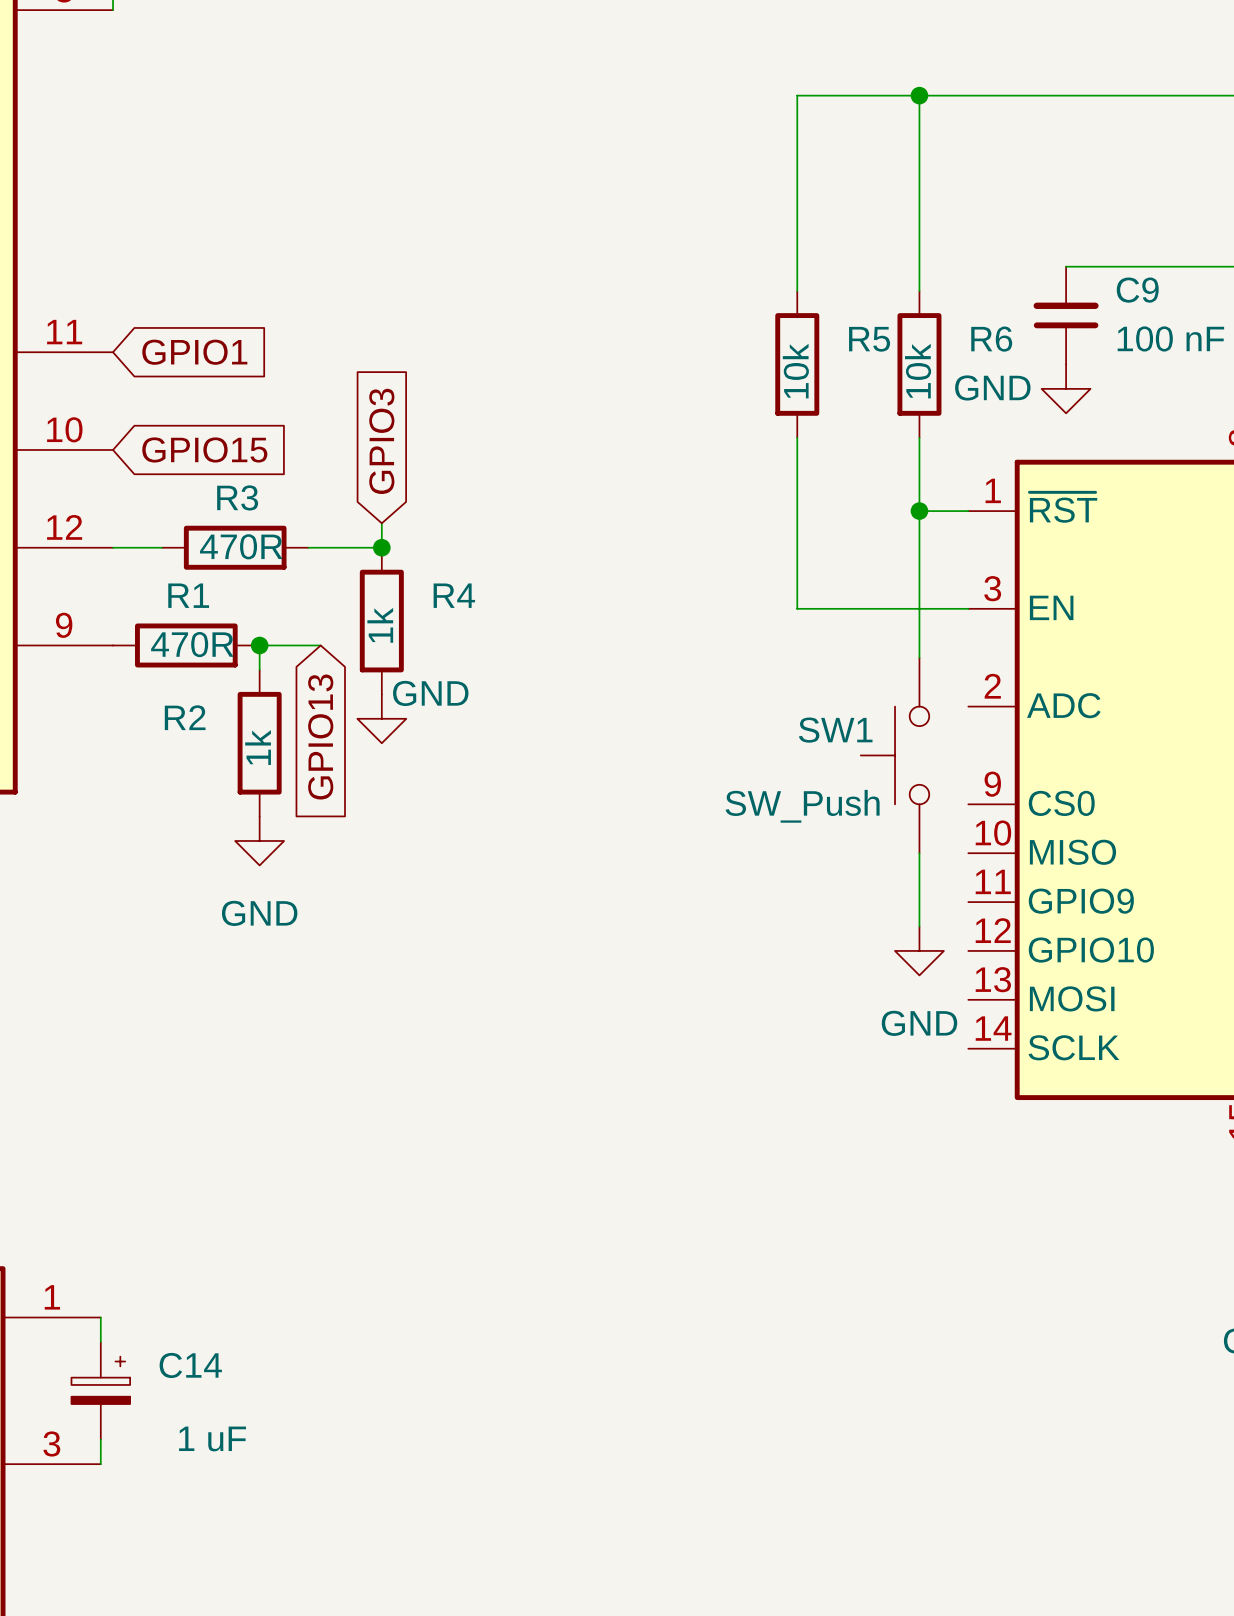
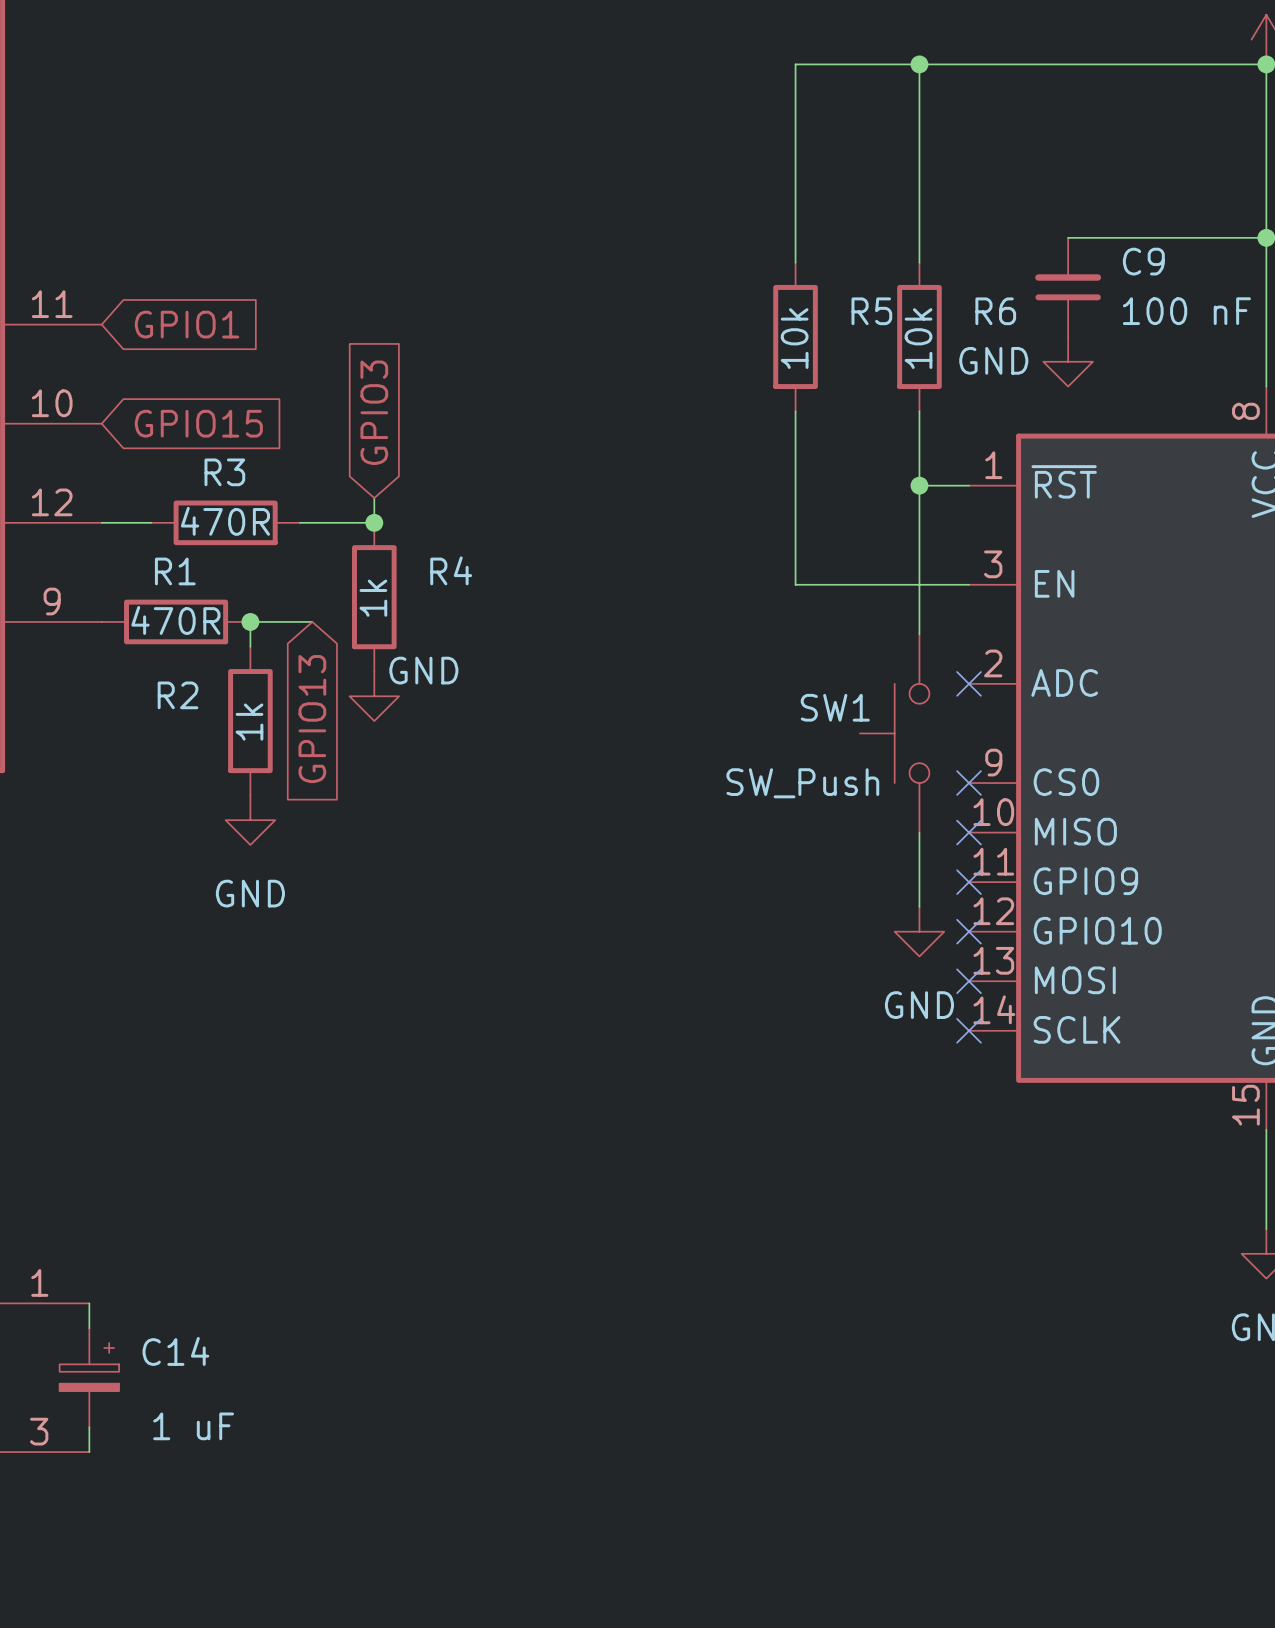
no-connect mark: none -> (969, 683)
no-connect mark: none -> (969, 783)
no-connect mark: none -> (969, 832)
no-connect mark: none -> (969, 882)
no-connect mark: none -> (969, 931)
no-connect mark: none -> (969, 981)
no-connect mark: none -> (969, 1030)

